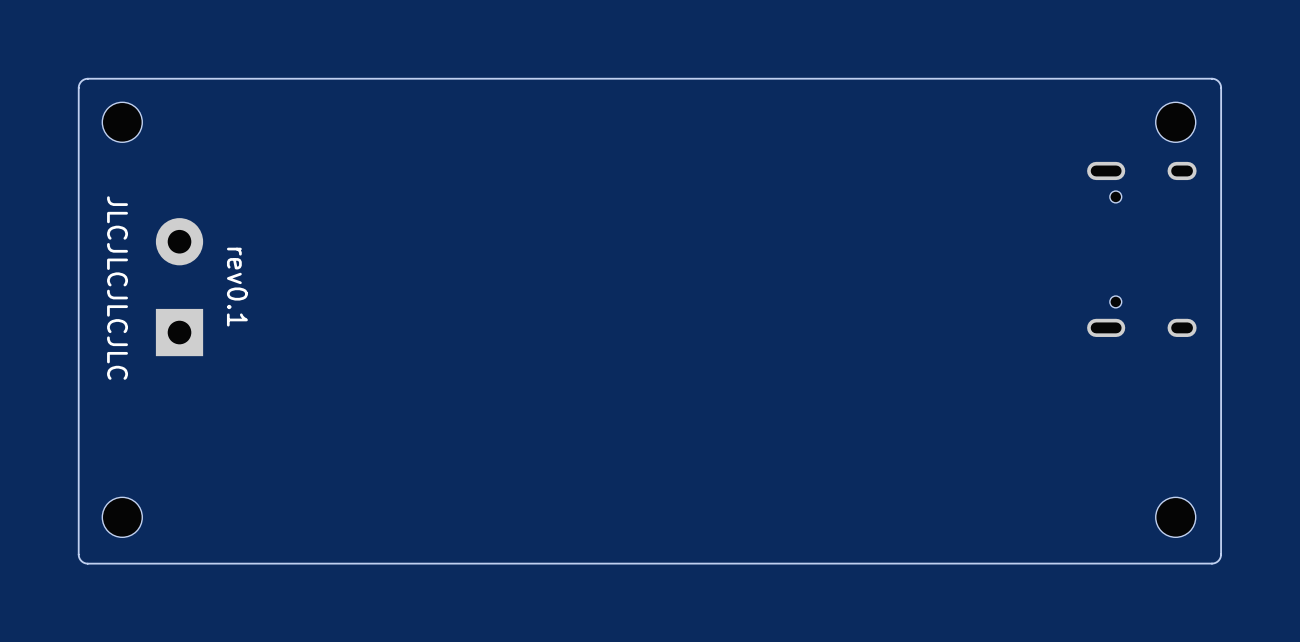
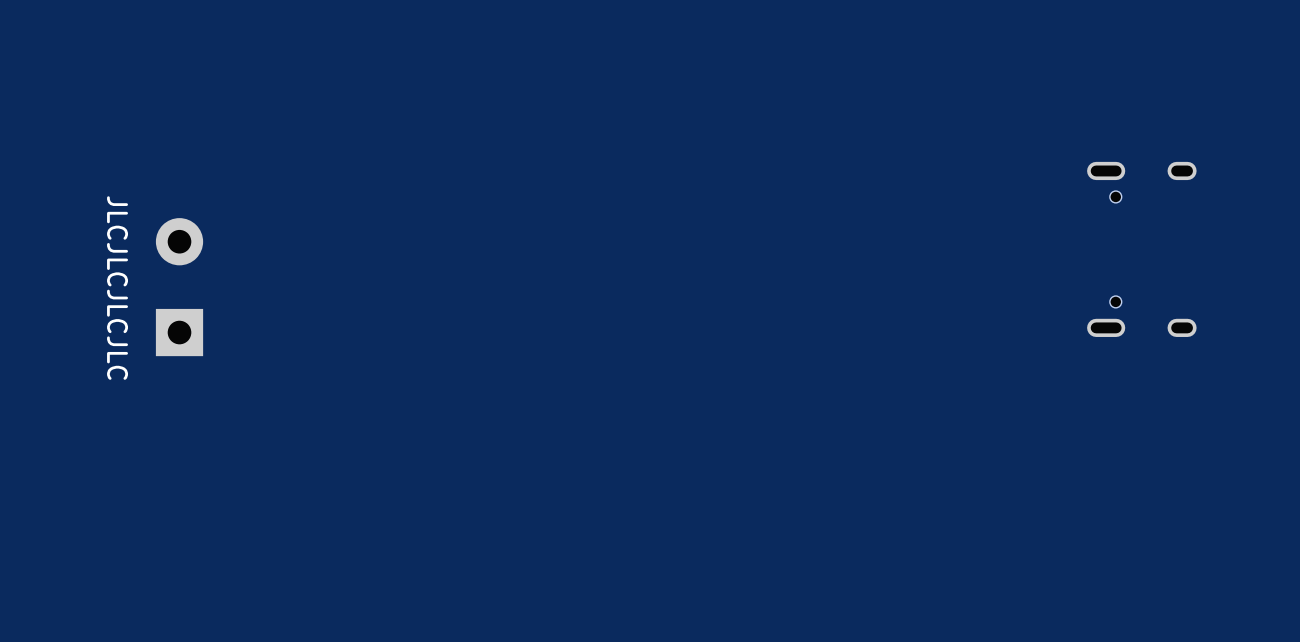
board edge: (1211, 78) (84, 79) (80, 82) (78, 87) (79, 558) (82, 561) (87, 563) (1215, 562) (1219, 559) (1221, 554) (1221, 87) (1218, 81) (1211, 78) -> none
part: (122, 122) -> none
part: (1175, 122) -> none
text: rev0.1 (237, 287) -> none
part: (122, 517) -> none
part: (1175, 517) -> none

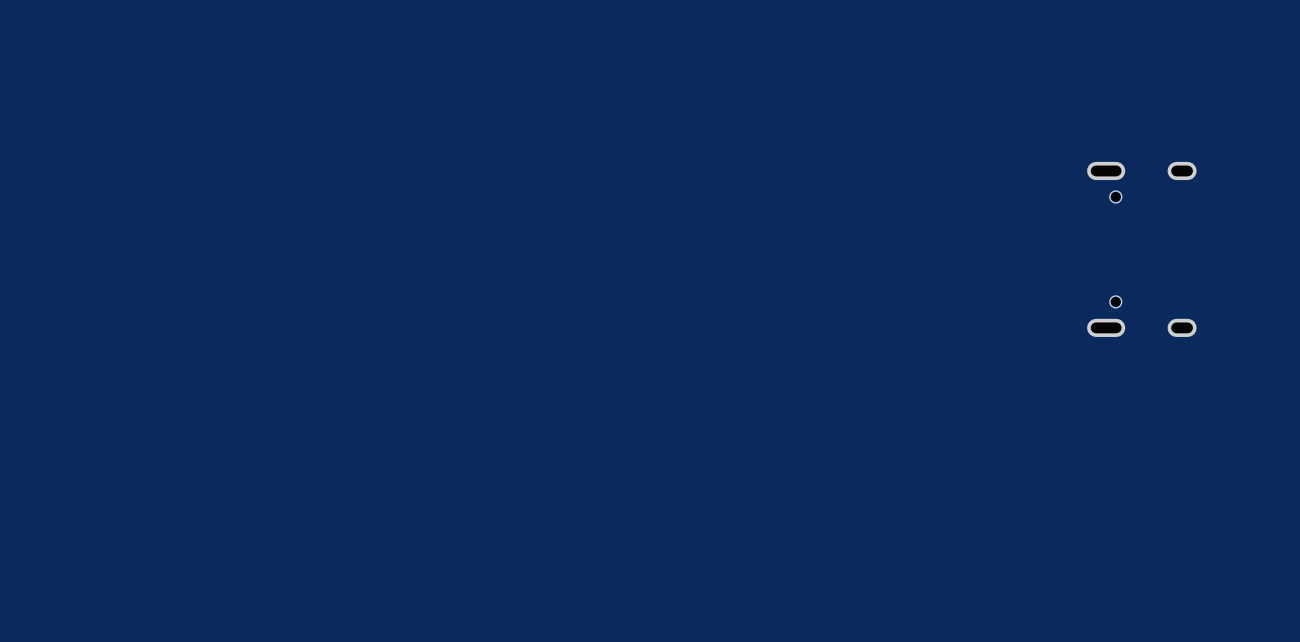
part: (179, 287) -> none
text: JLCJLCJLCJLC (117, 288) -> none

